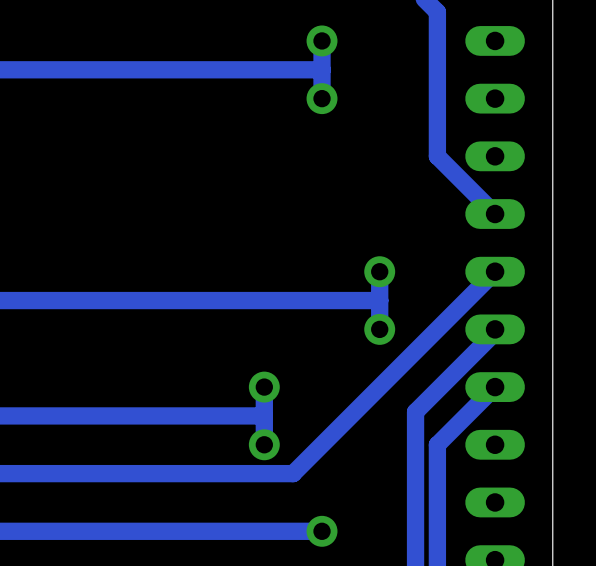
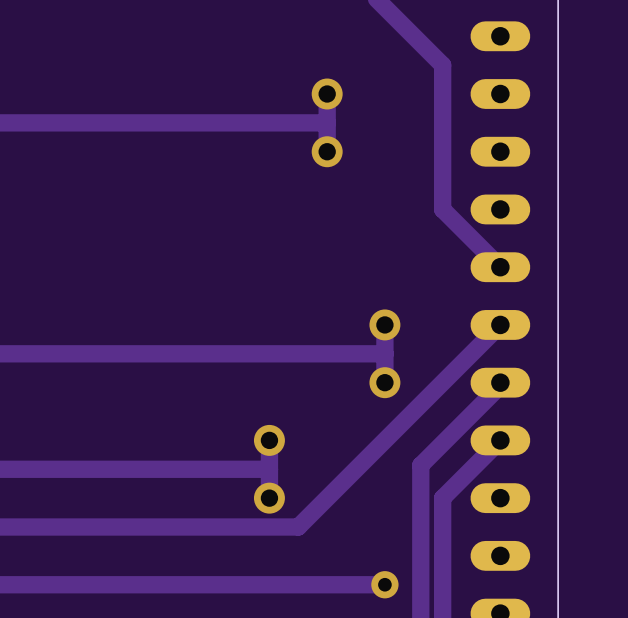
via: (322, 531) -> none
track: none -> (384, 584) (327, 584)
via: none -> (384, 584)

